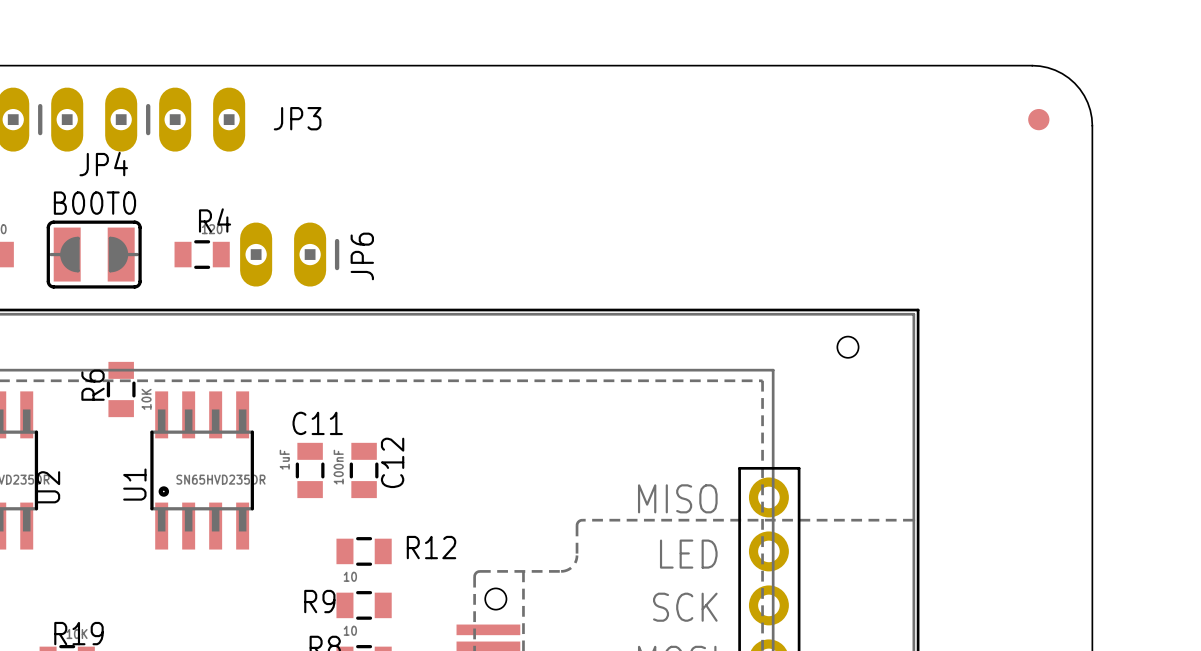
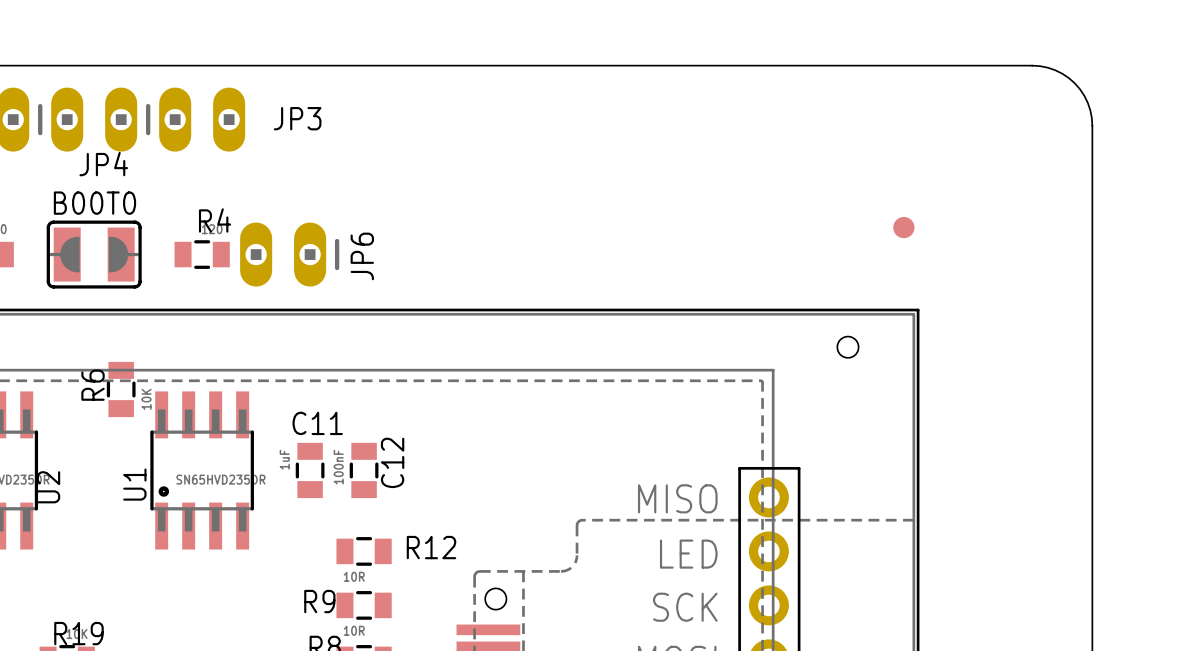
part position: (1038, 119) -> (903, 227)
R12 value: 10 (350, 576) -> 10R (354, 576)
R9 value: 10 (350, 630) -> 10R (354, 630)

